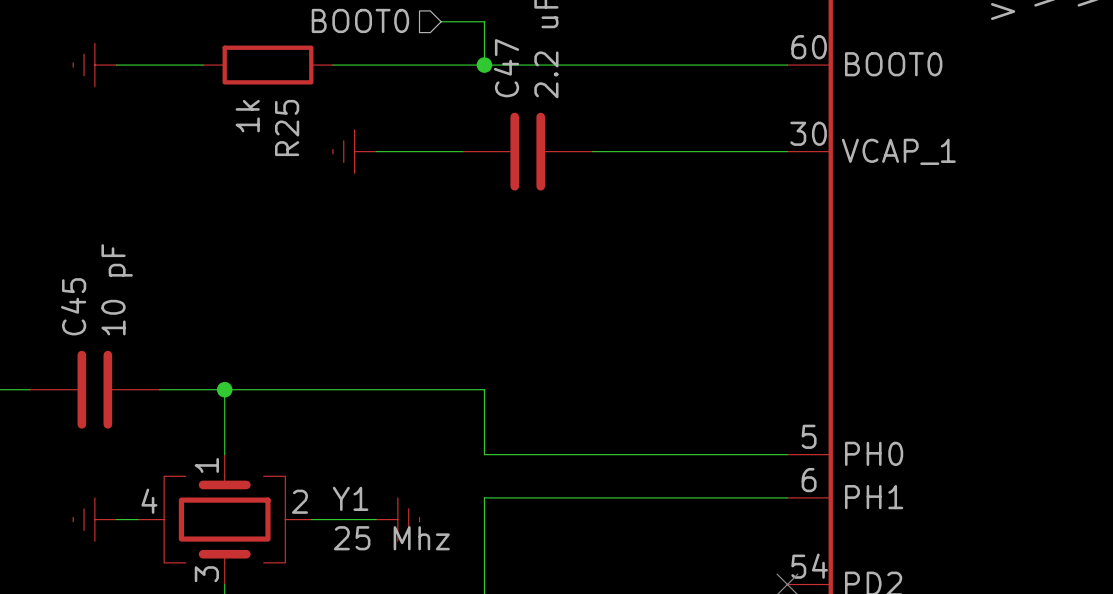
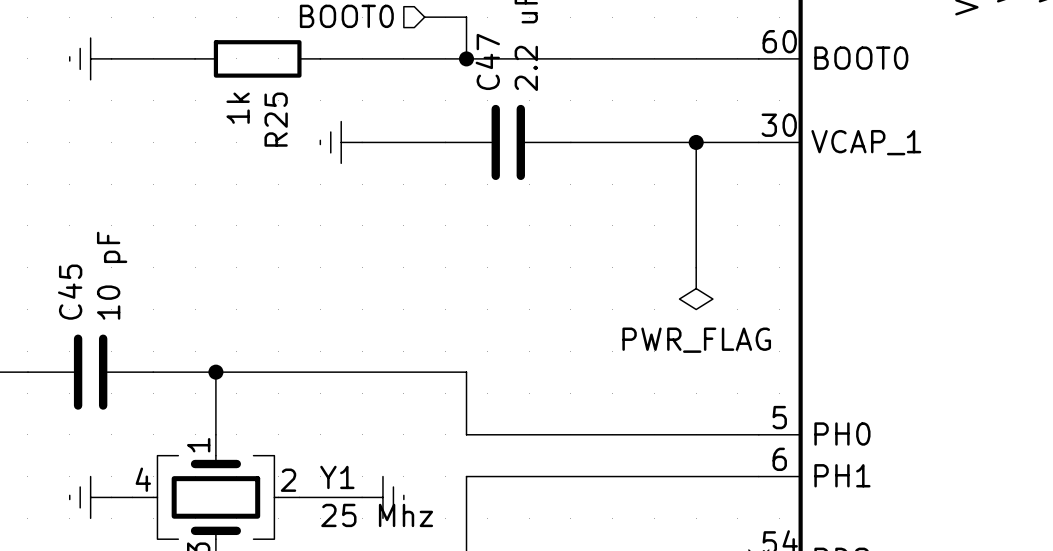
wire: none -> (696, 142) (696, 267)
junction: none -> (696, 142)
power symbol: none -> PWR_FLAG (696, 288)

